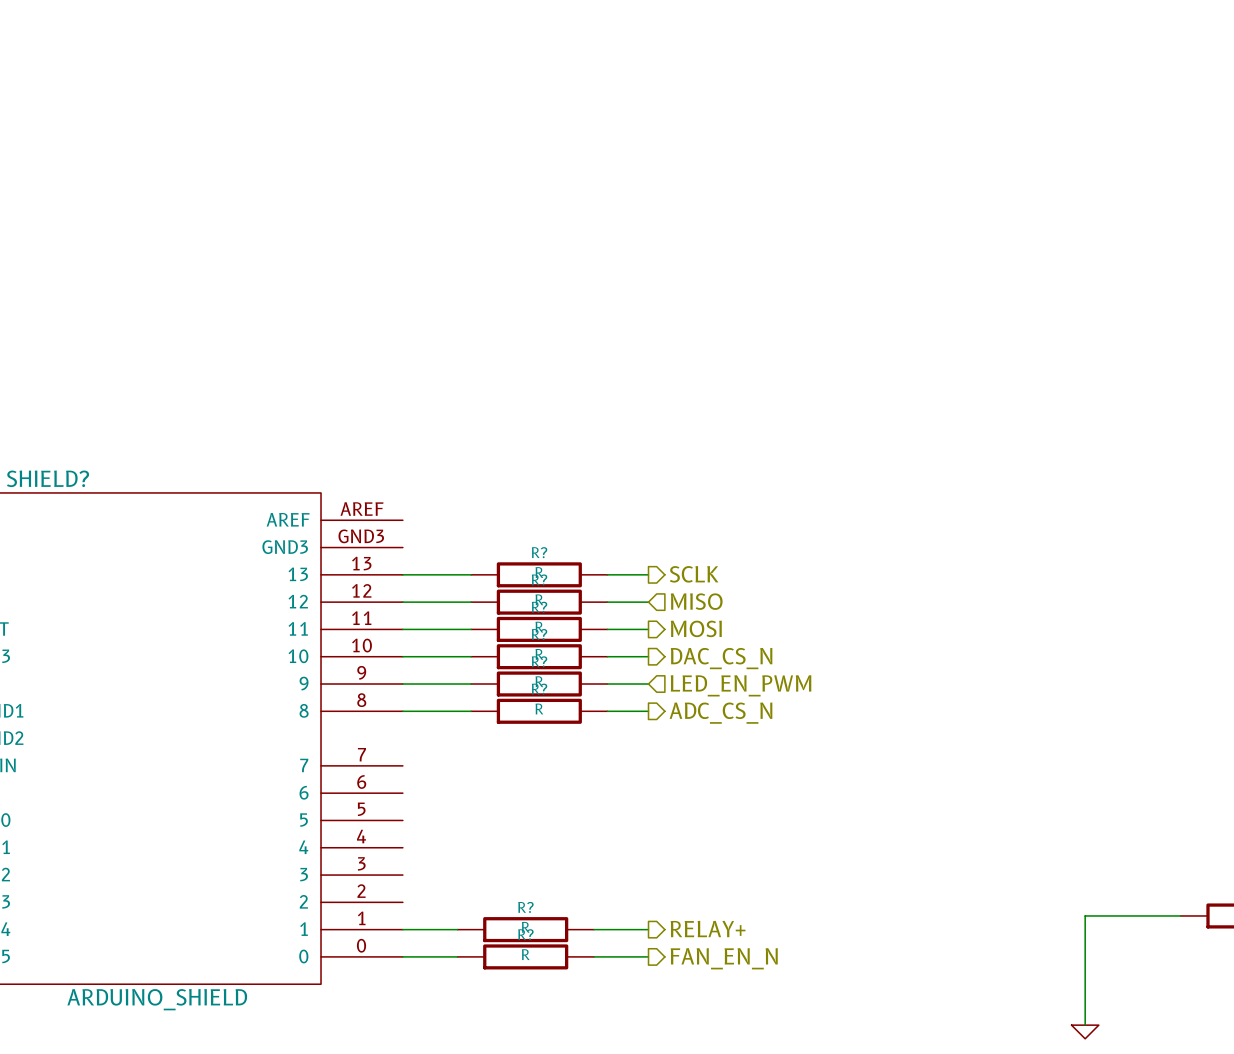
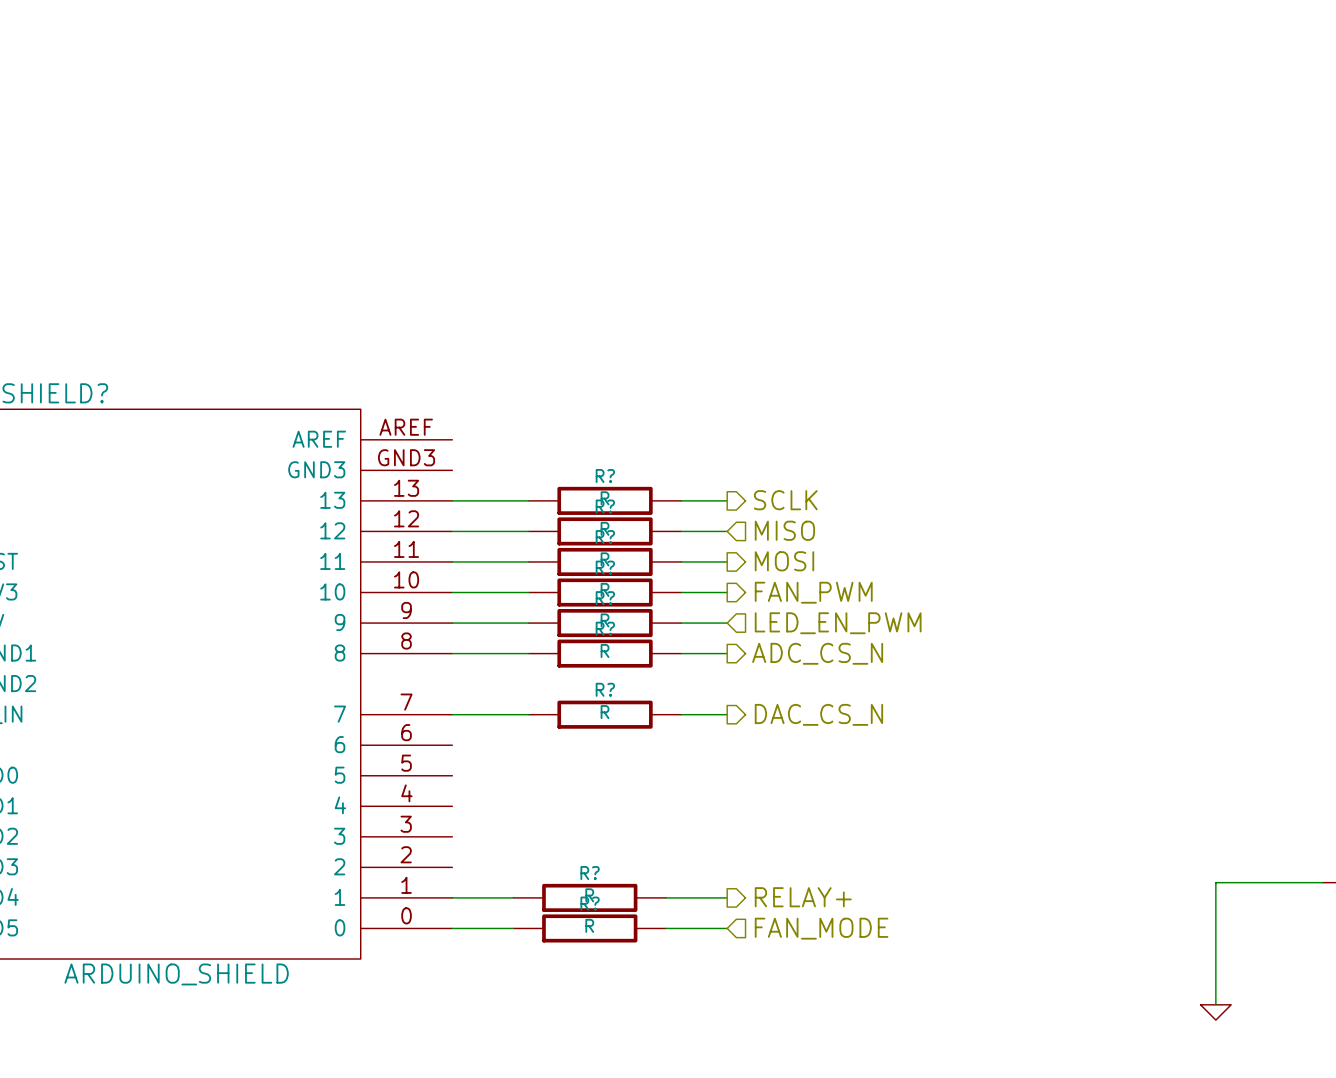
hierarchical label: DAC_CS_N (721, 658) -> FAN_PWM (813, 592)
wire: none -> (452, 714) (528, 714)
R?: none -> R (605, 714)
wire: none -> (681, 714) (727, 714)
hierarchical label: none -> DAC_CS_N (818, 714)
hierarchical label shape: output (724, 958) -> input (821, 928)
hierarchical label: FAN_EN_N (724, 958) -> FAN_MODE (821, 928)

